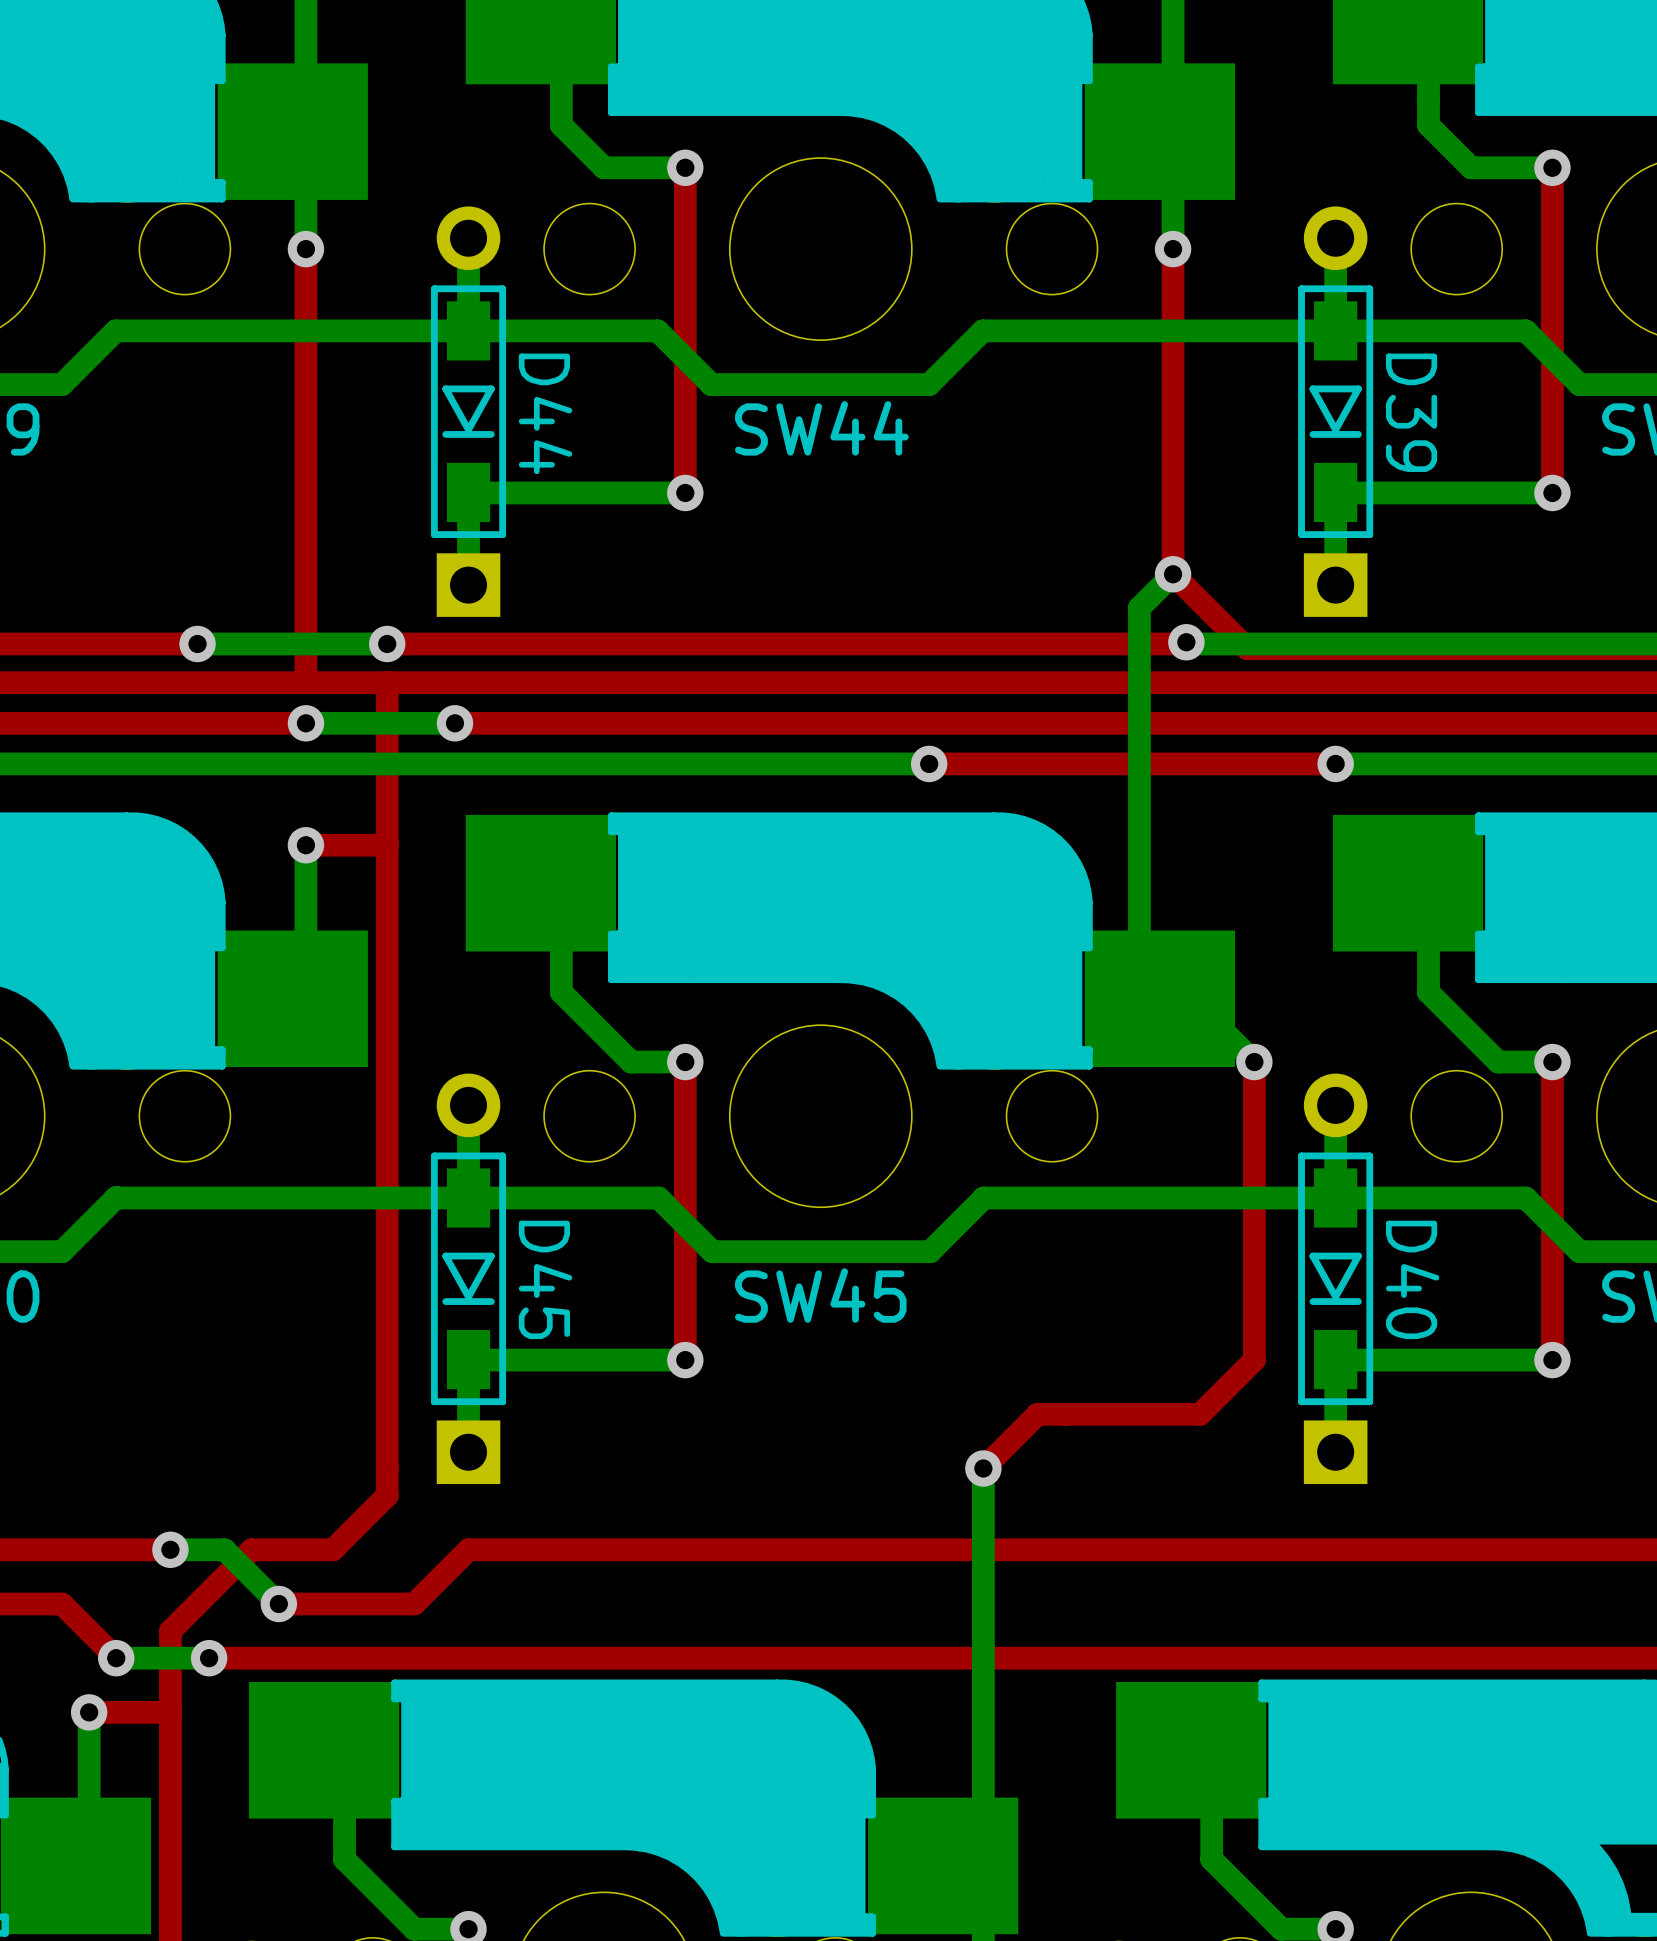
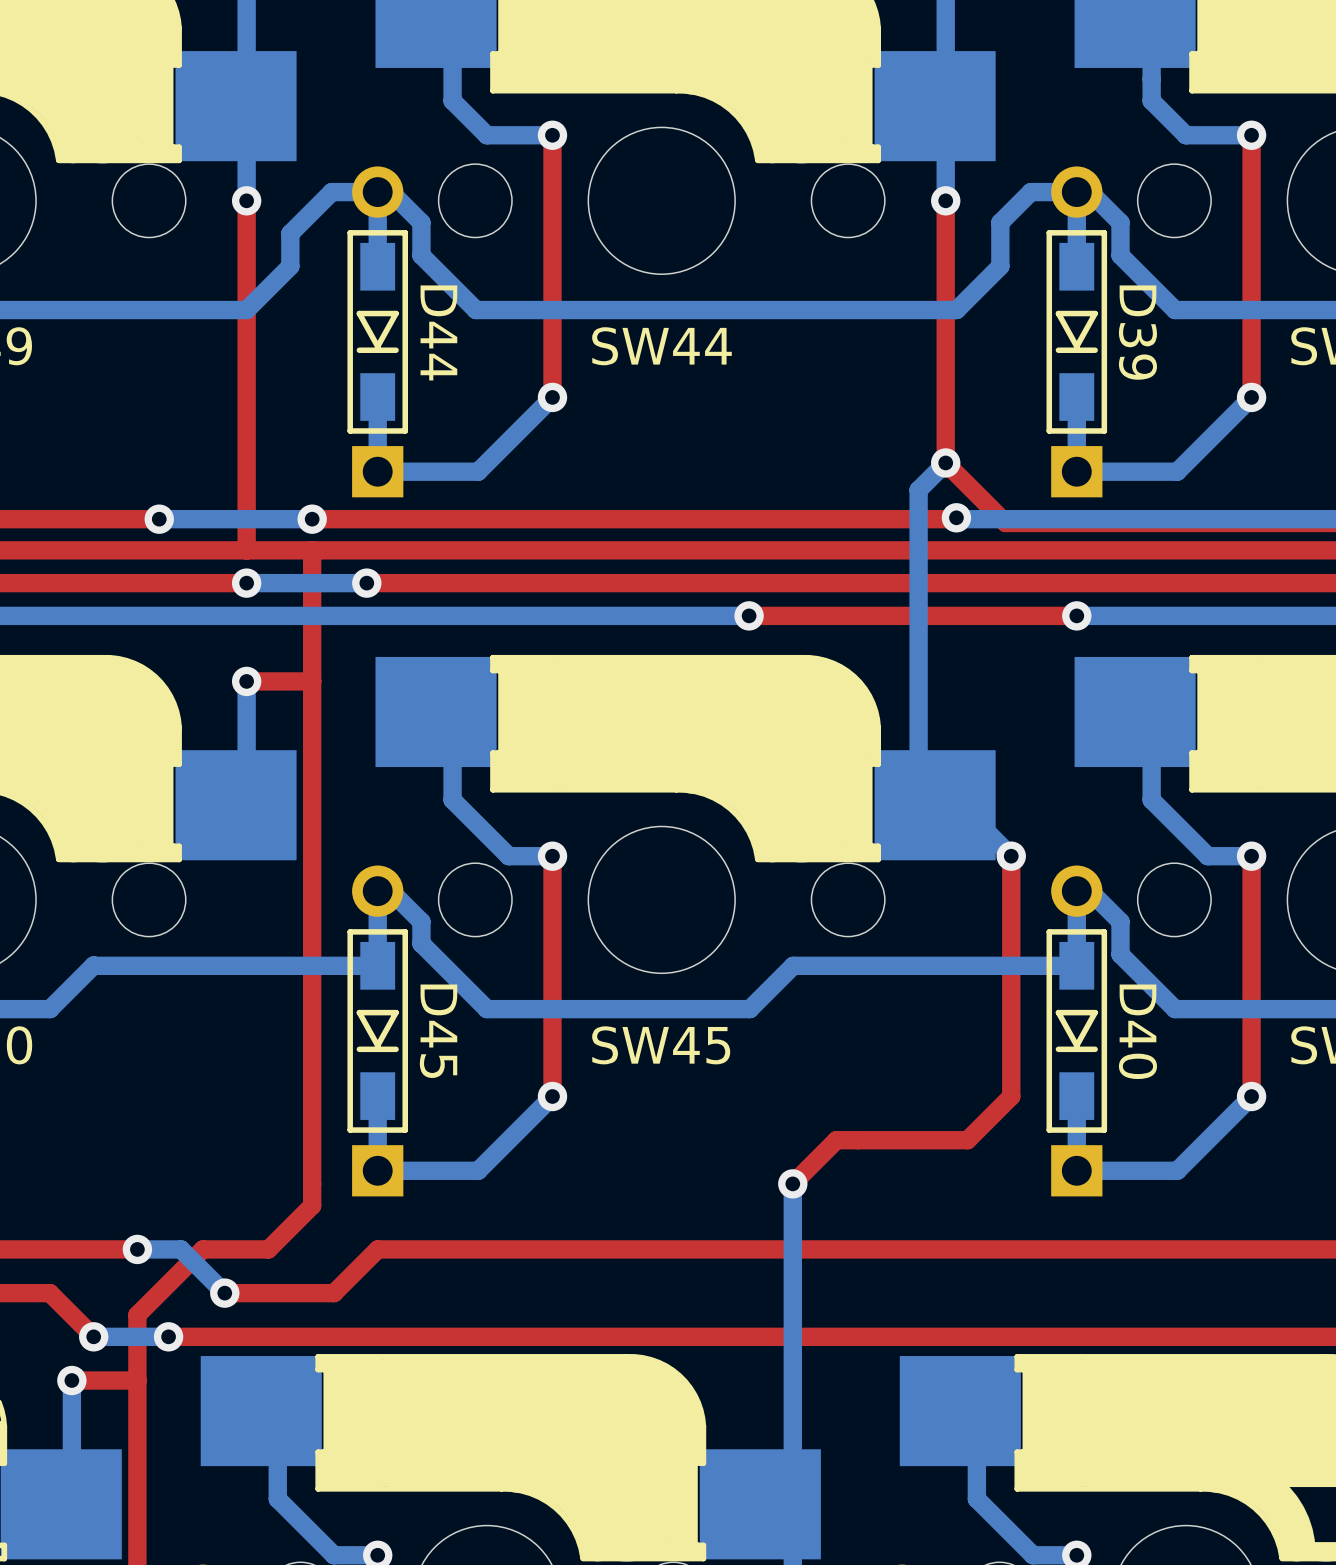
bottom track: (711, 384) (657, 330) (115, 330) (62, 384) -> (573, 310) (476, 310) (421, 255) (421, 222) (390, 192) (331, 192) (290, 233) (290, 266) (246, 310) (50, 310)
bottom track: (1579, 384) (1525, 330) (982, 330) (929, 384) -> (1273, 310) (1175, 310) (1120, 255) (1120, 222) (1089, 192) (1030, 192) (1000, 222) (1000, 266) (956, 310) (749, 310)
bottom track: (685, 492) (469, 492) -> (552, 397) (478, 471) (377, 471)
bottom track: (1552, 492) (1336, 492) -> (1251, 397) (1177, 471) (1076, 471)
bottom track: (468, 1198) (658, 1198) (712, 1251) -> (377, 891) (390, 891) (421, 921) (421, 943) (486, 1009) (574, 1009)
bottom track: (1335, 1198) (1525, 1198) (1579, 1251) -> (1076, 891) (1089, 891) (1120, 921) (1120, 954) (1175, 1009) (1273, 1009)
bottom track: (685, 1360) (469, 1360) -> (552, 1096) (478, 1170) (377, 1170)
bottom track: (1552, 1360) (1336, 1360) -> (1251, 1096) (1177, 1170) (1076, 1170)

